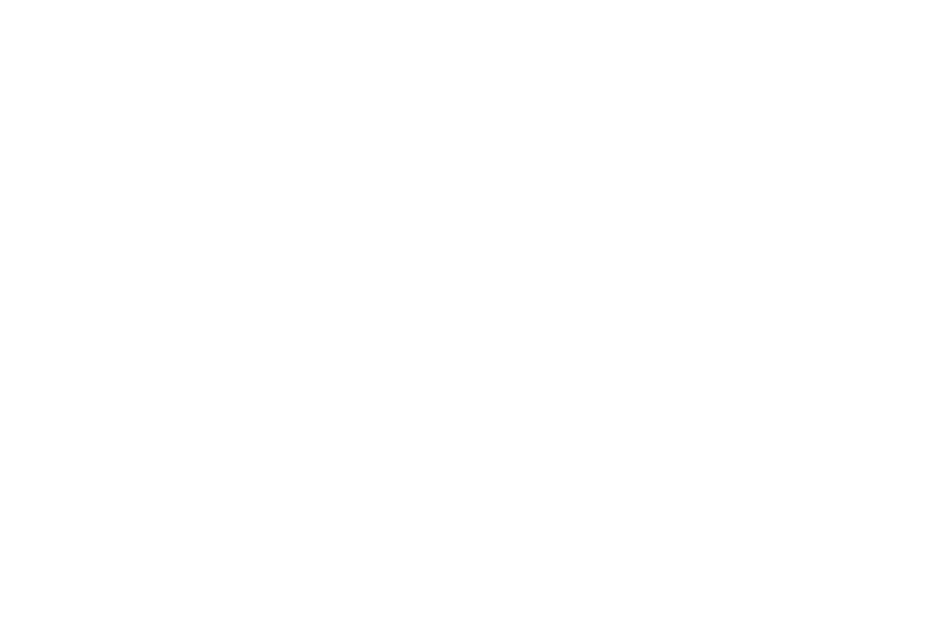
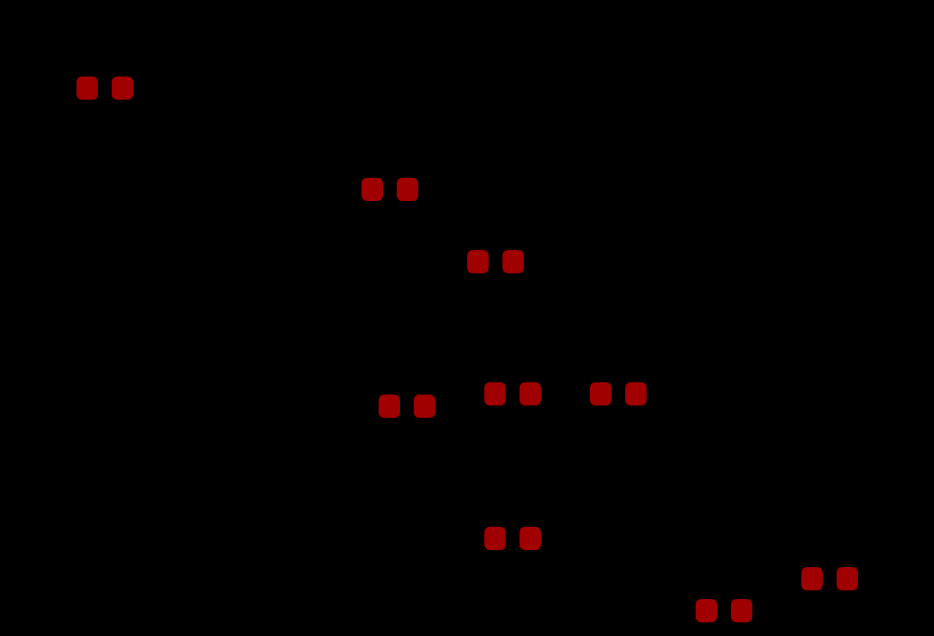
part: none -> (104, 88)
part: none -> (389, 189)
part: none -> (495, 261)
part: none -> (512, 393)
part: none -> (618, 393)
part: none -> (406, 406)
part: none -> (512, 538)
part: none -> (829, 578)
part: none -> (723, 610)

